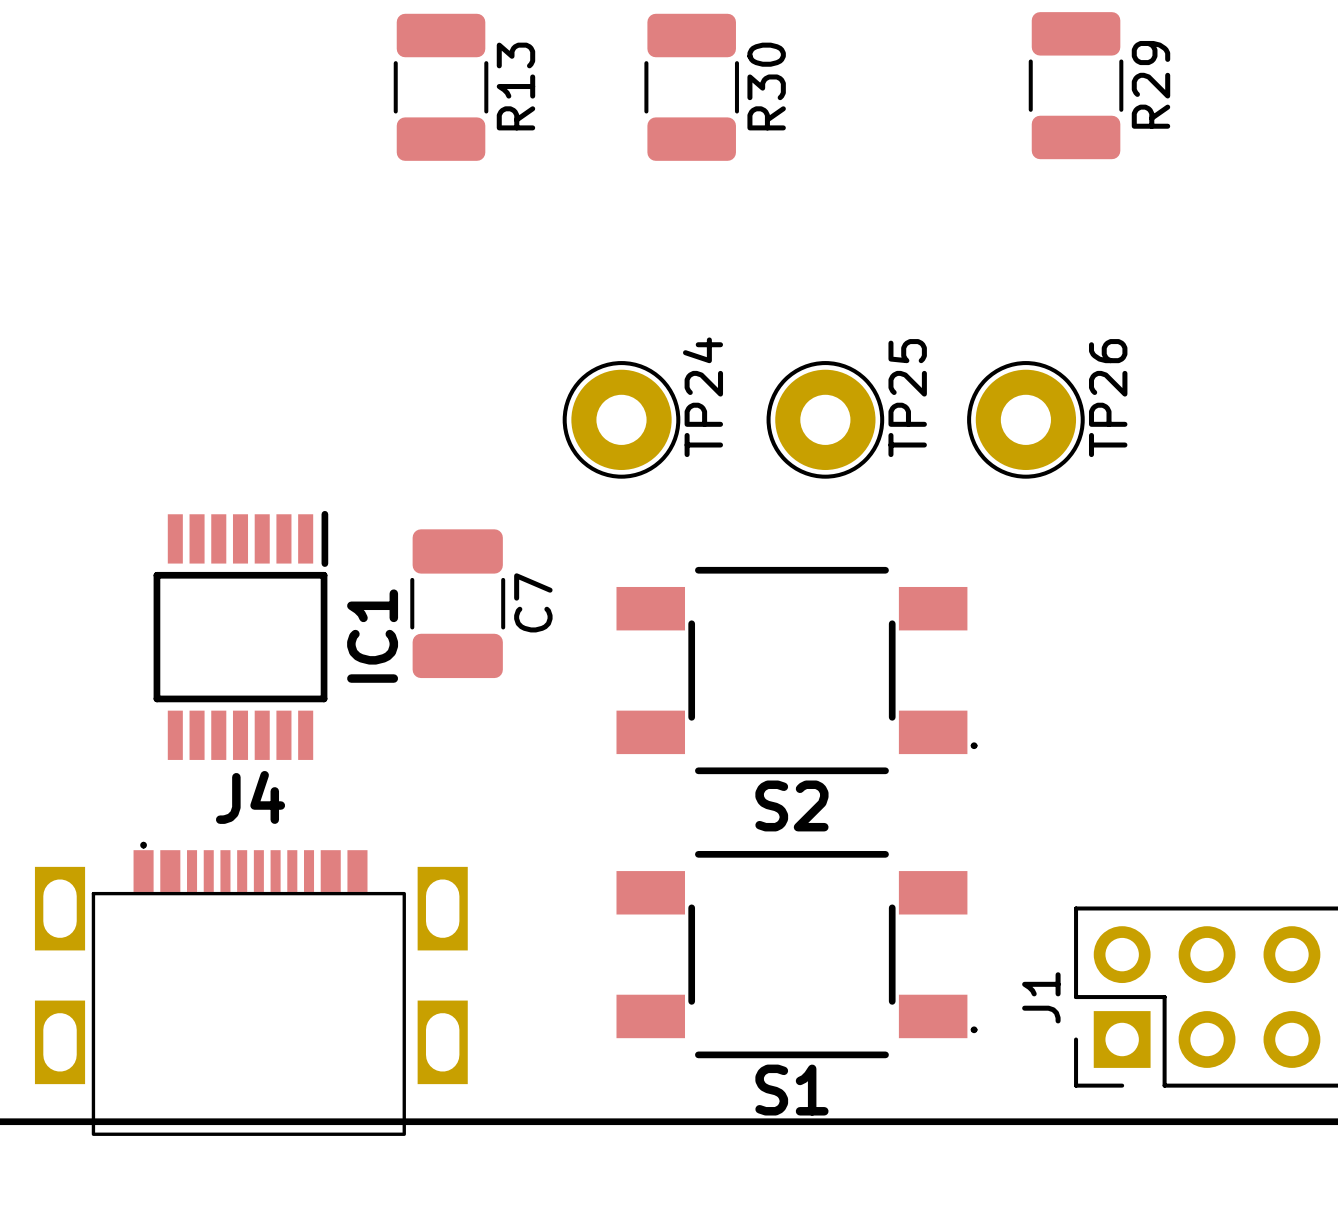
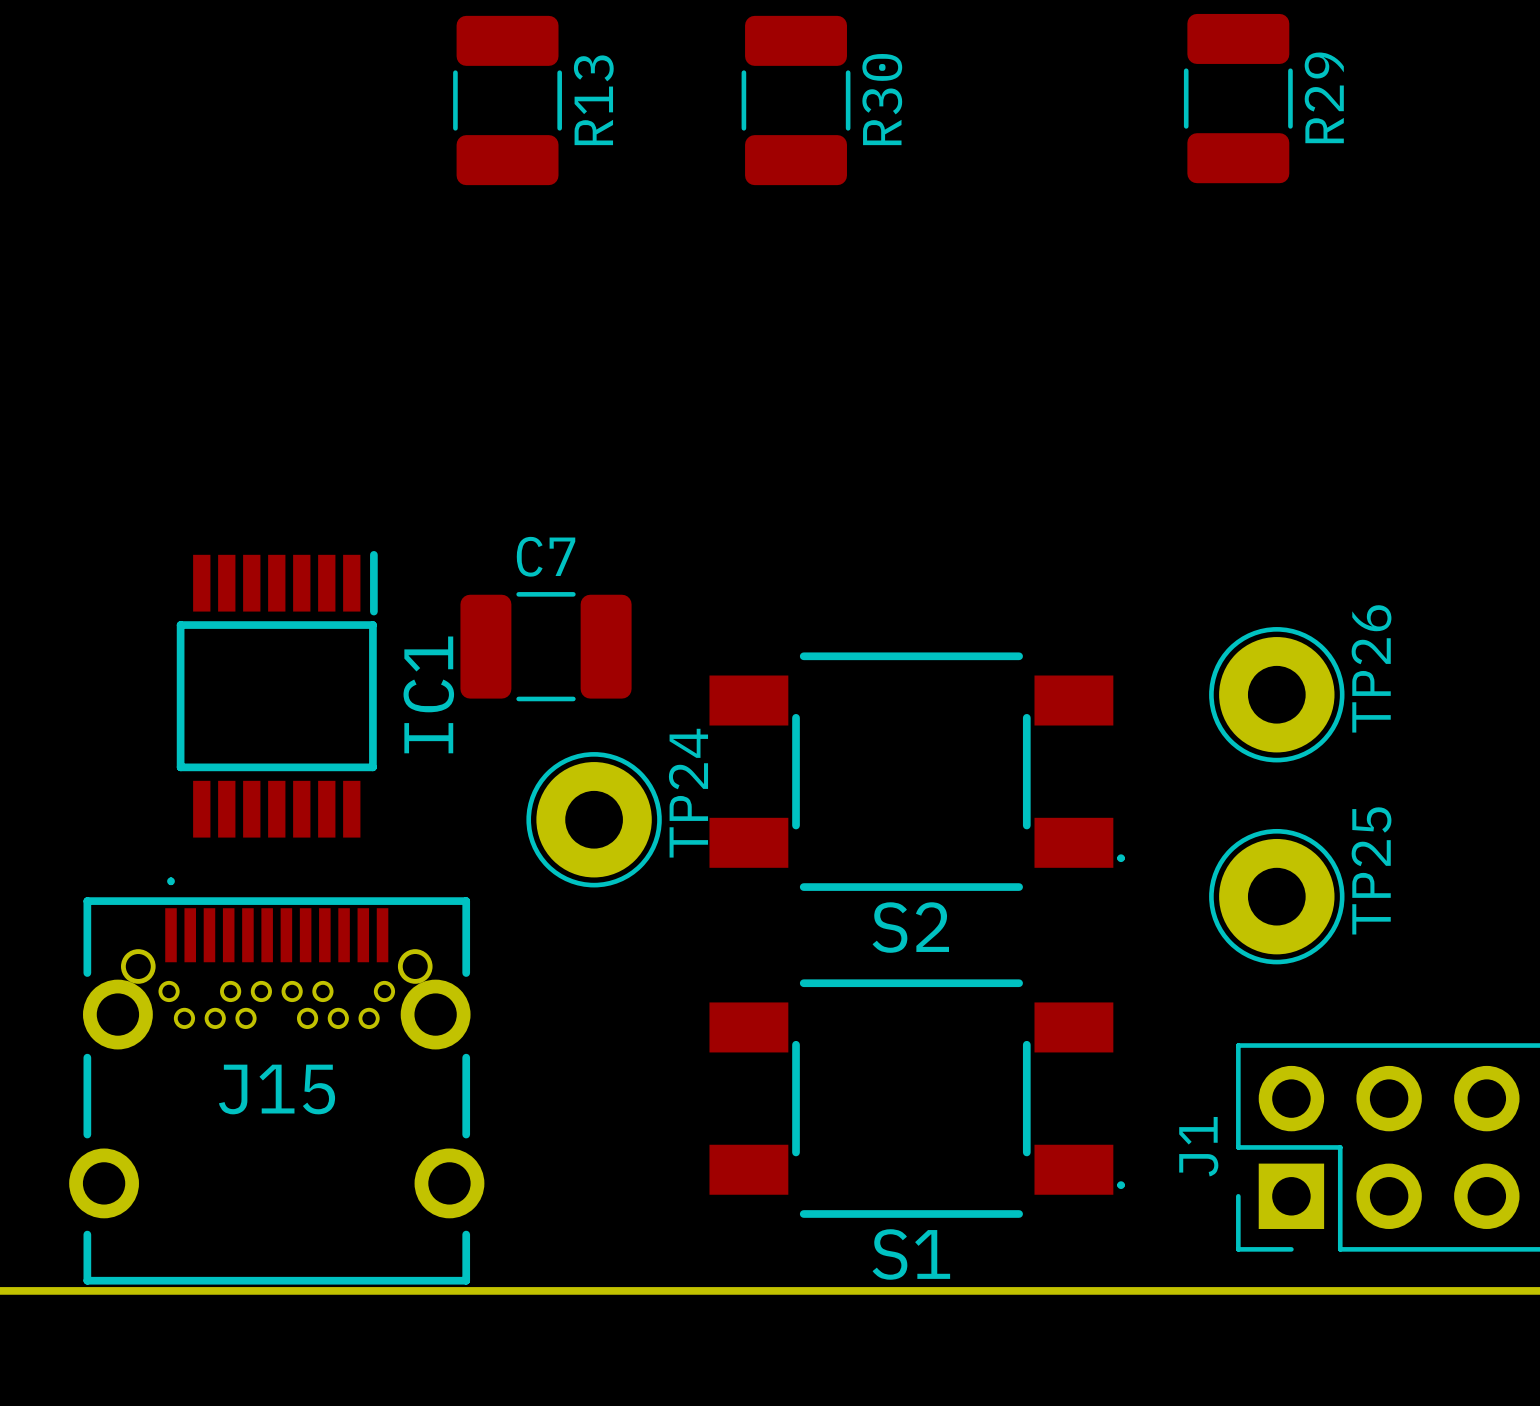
TP24 position: (621, 419) -> (594, 819)
TP25 position: (825, 419) -> (1276, 896)
TP26 position: (1025, 419) -> (1276, 694)
C7 name position: C7 (533, 602) -> C7 (546, 556)
C7 rotation: 0° (457, 603) -> 90° clockwise (546, 646)
IC1 position: (240, 635) -> (277, 694)
J15: none -> (276, 1081)
J4: (251, 988) -> none

